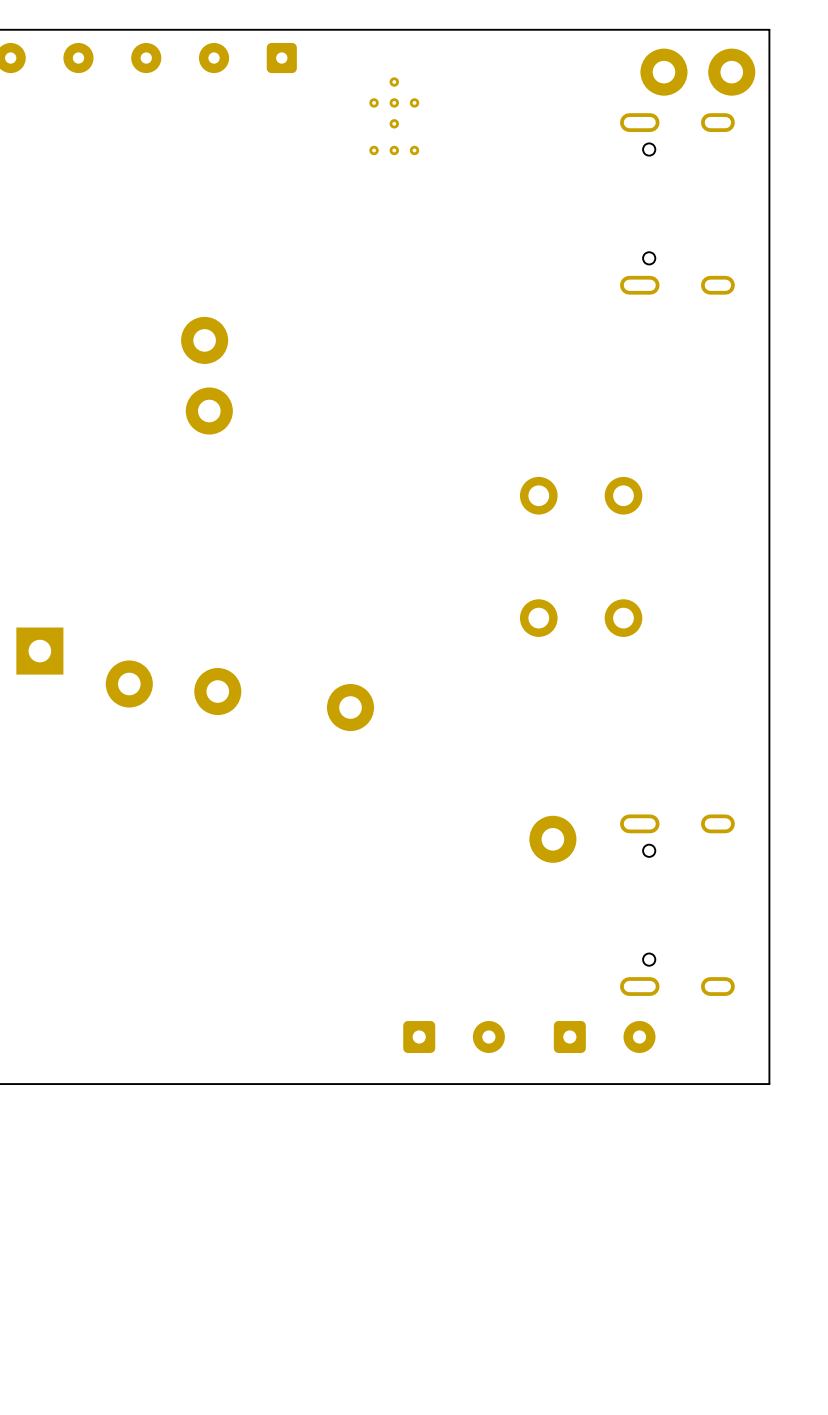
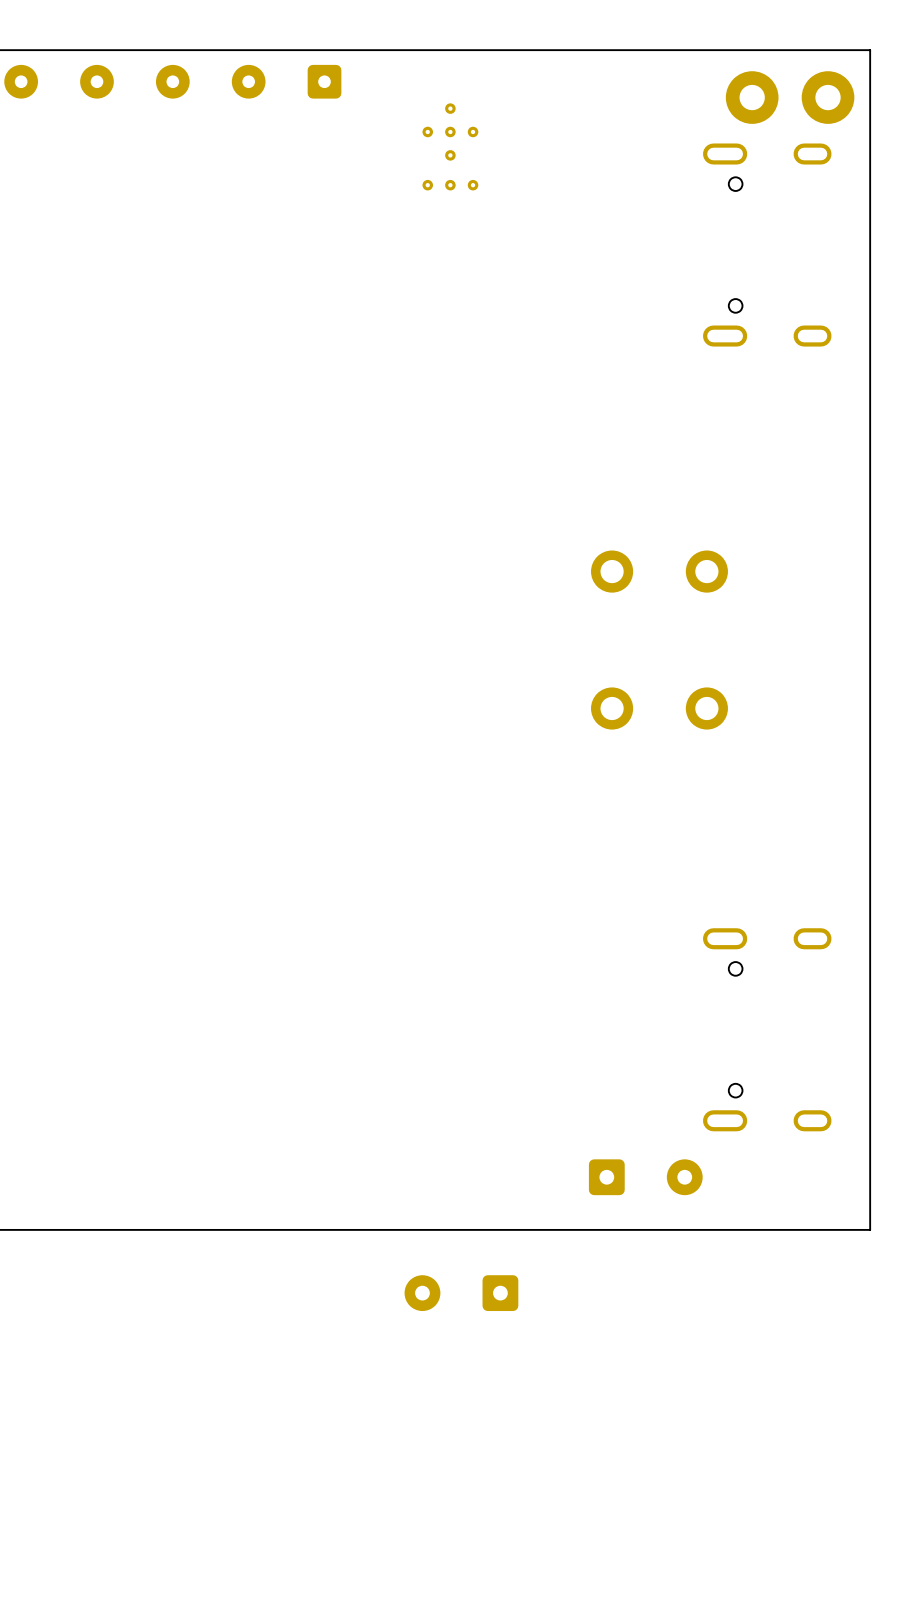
part: (204, 340) -> none
part: (209, 411) -> none
part: (39, 651) -> none
part: (129, 683) -> none
part: (217, 691) -> none
part: (350, 707) -> none
part: (552, 839) -> none
part: (454, 1036) -> none
part position: (604, 1036) -> (645, 1177)
part: none -> (461, 1293)

